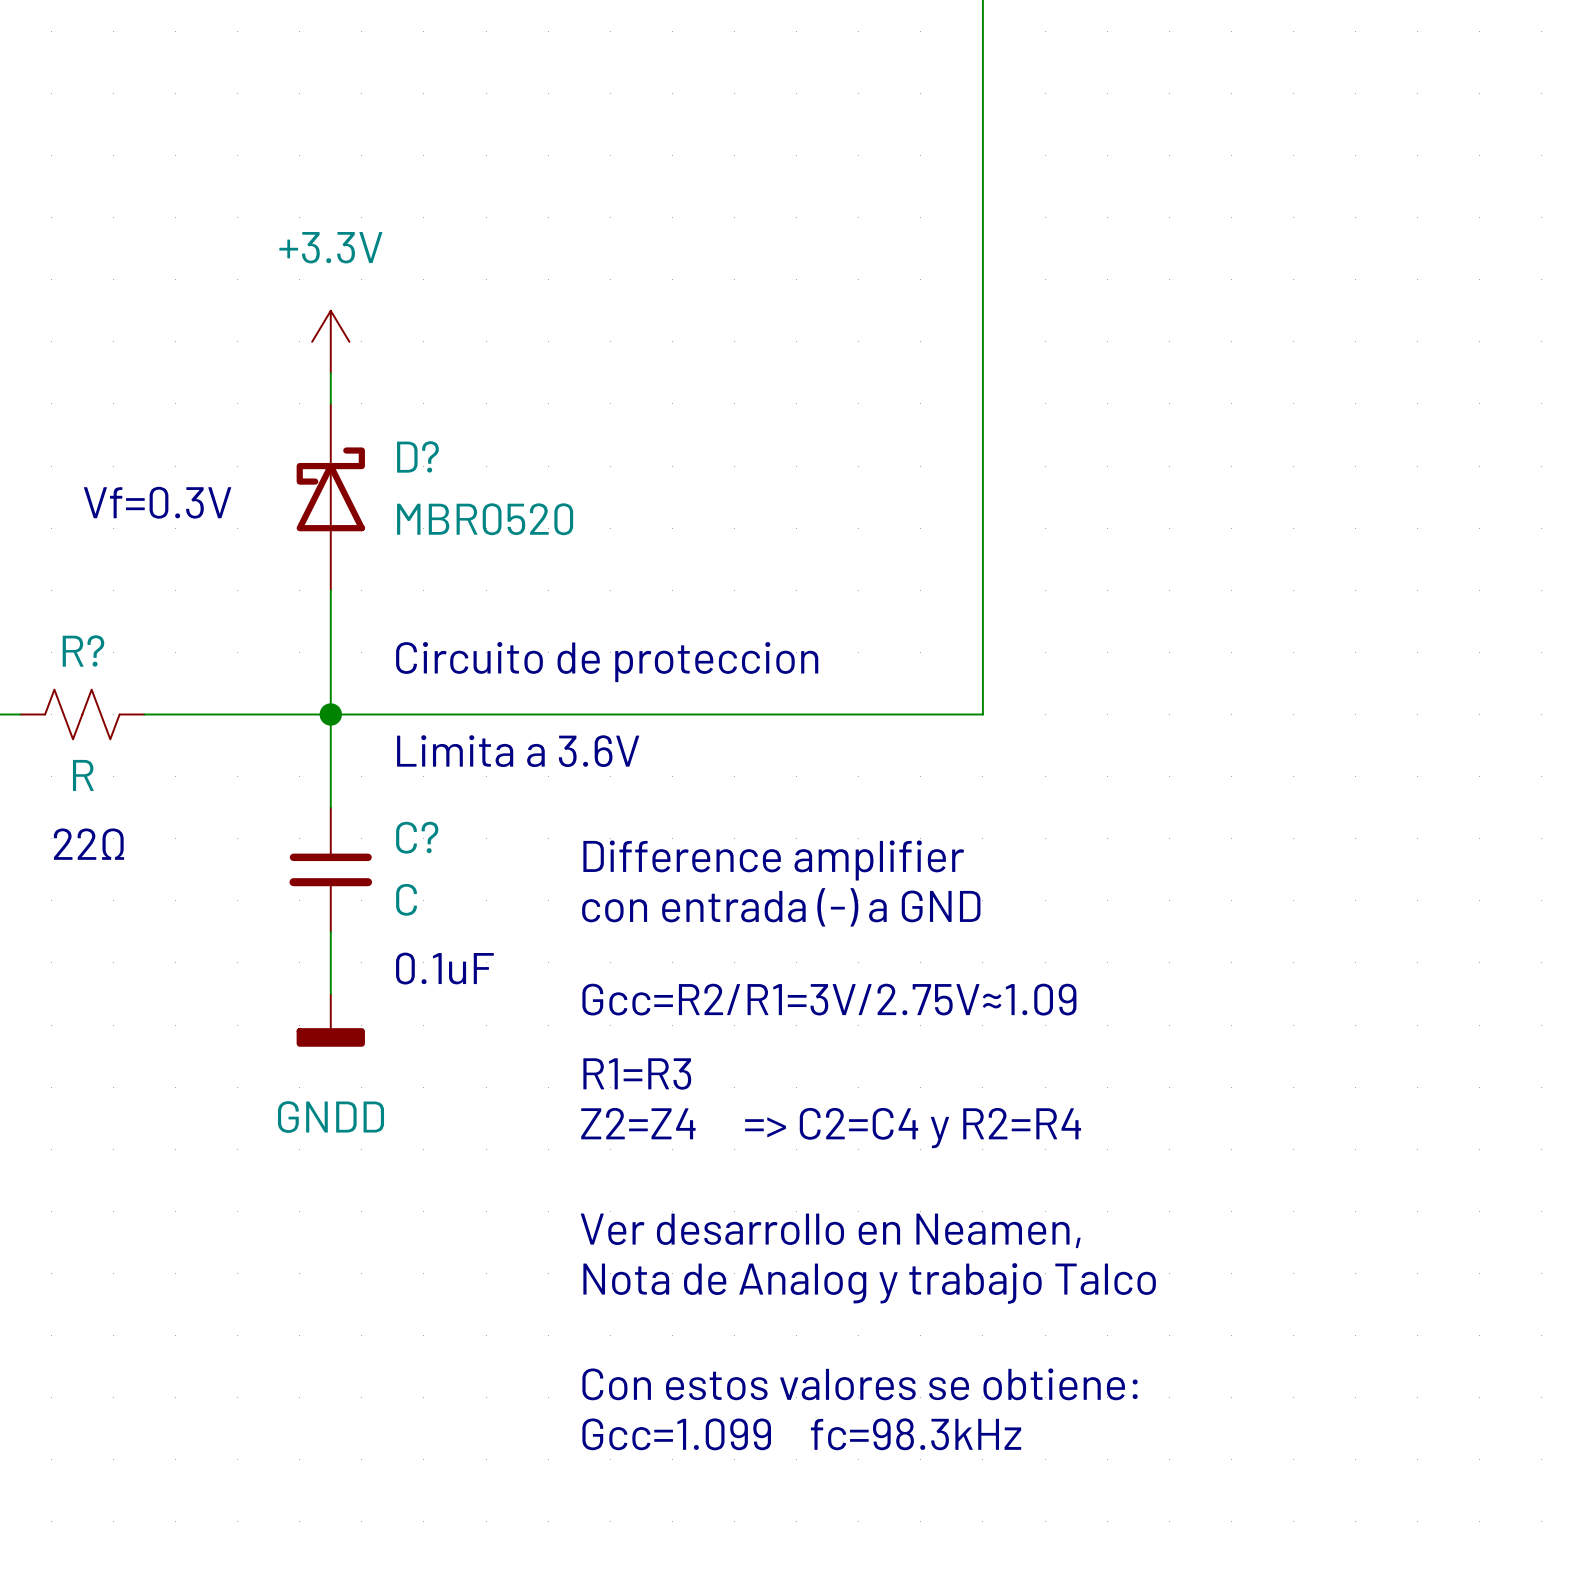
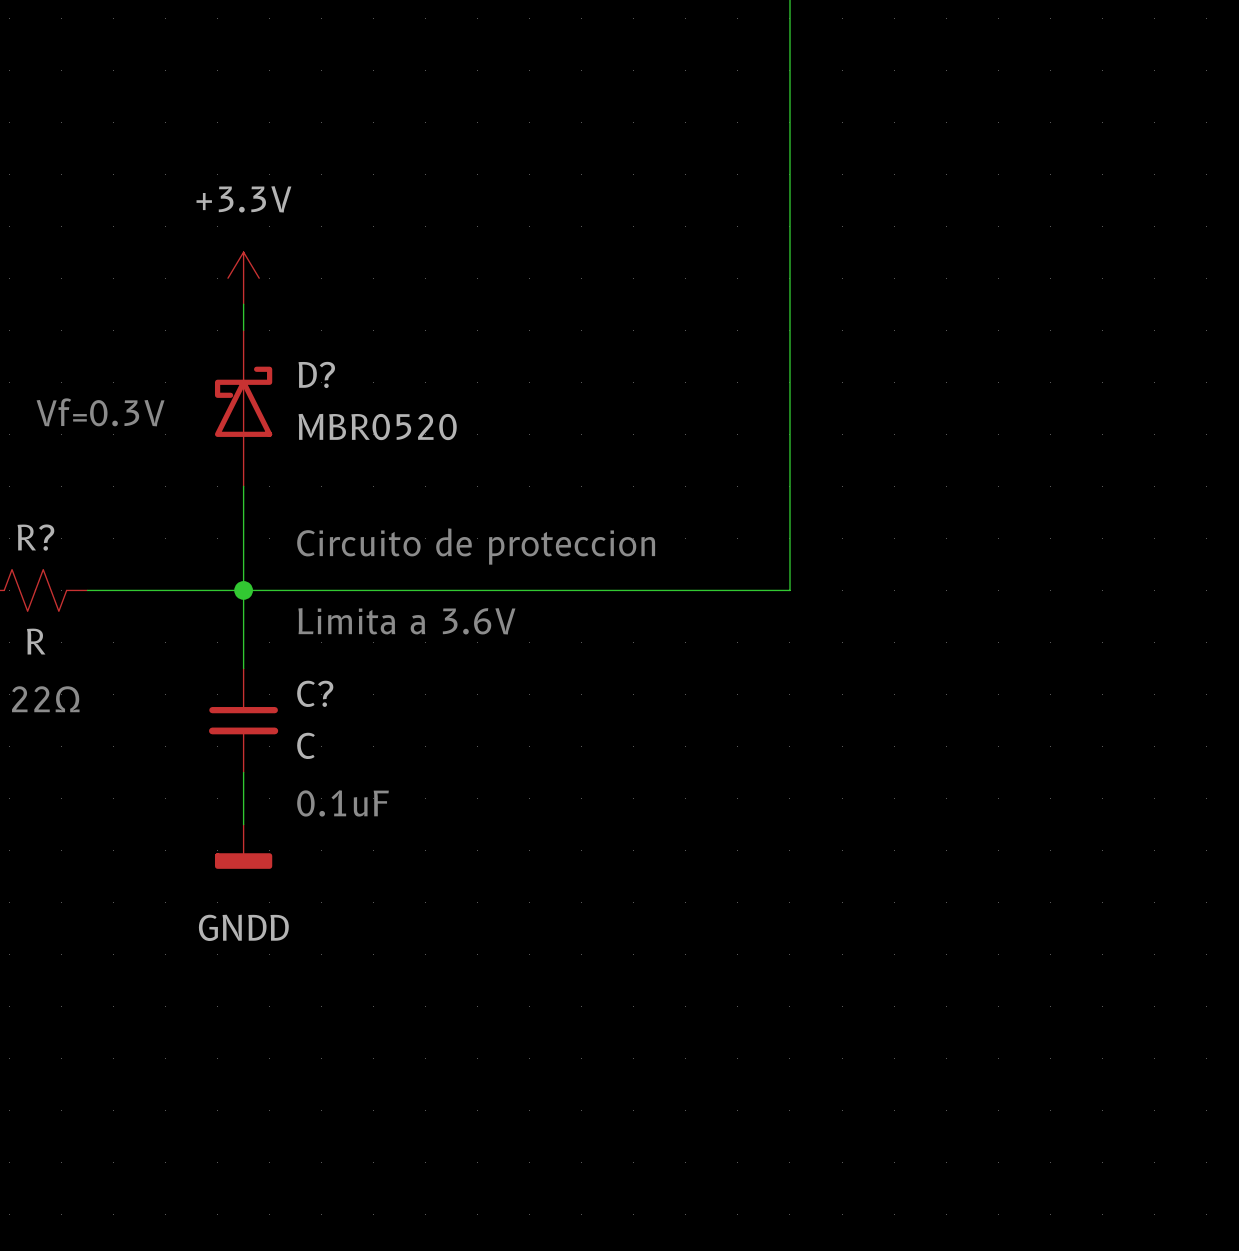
text: Difference amplifier (773, 860) -> none
text: con entrada (-) a GND (781, 907) -> none
text: Gcc=R2/R1=3V/2.75V≈1.09 (829, 999) -> none
text: R1=R3 (637, 1073) -> none
text: Z2=Z4 (638, 1123) -> none
text: => C2=C4 y R2=R4 (913, 1128) -> none
text: Ver desarrollo en Neamen, (830, 1230) -> none
text: Nota de Analog y trabajo Talco (869, 1283) -> none
text: Con estos valores se obtiene: (860, 1384) -> none
text: Gcc=1.099 fc=98.3kHz (801, 1434) -> none

